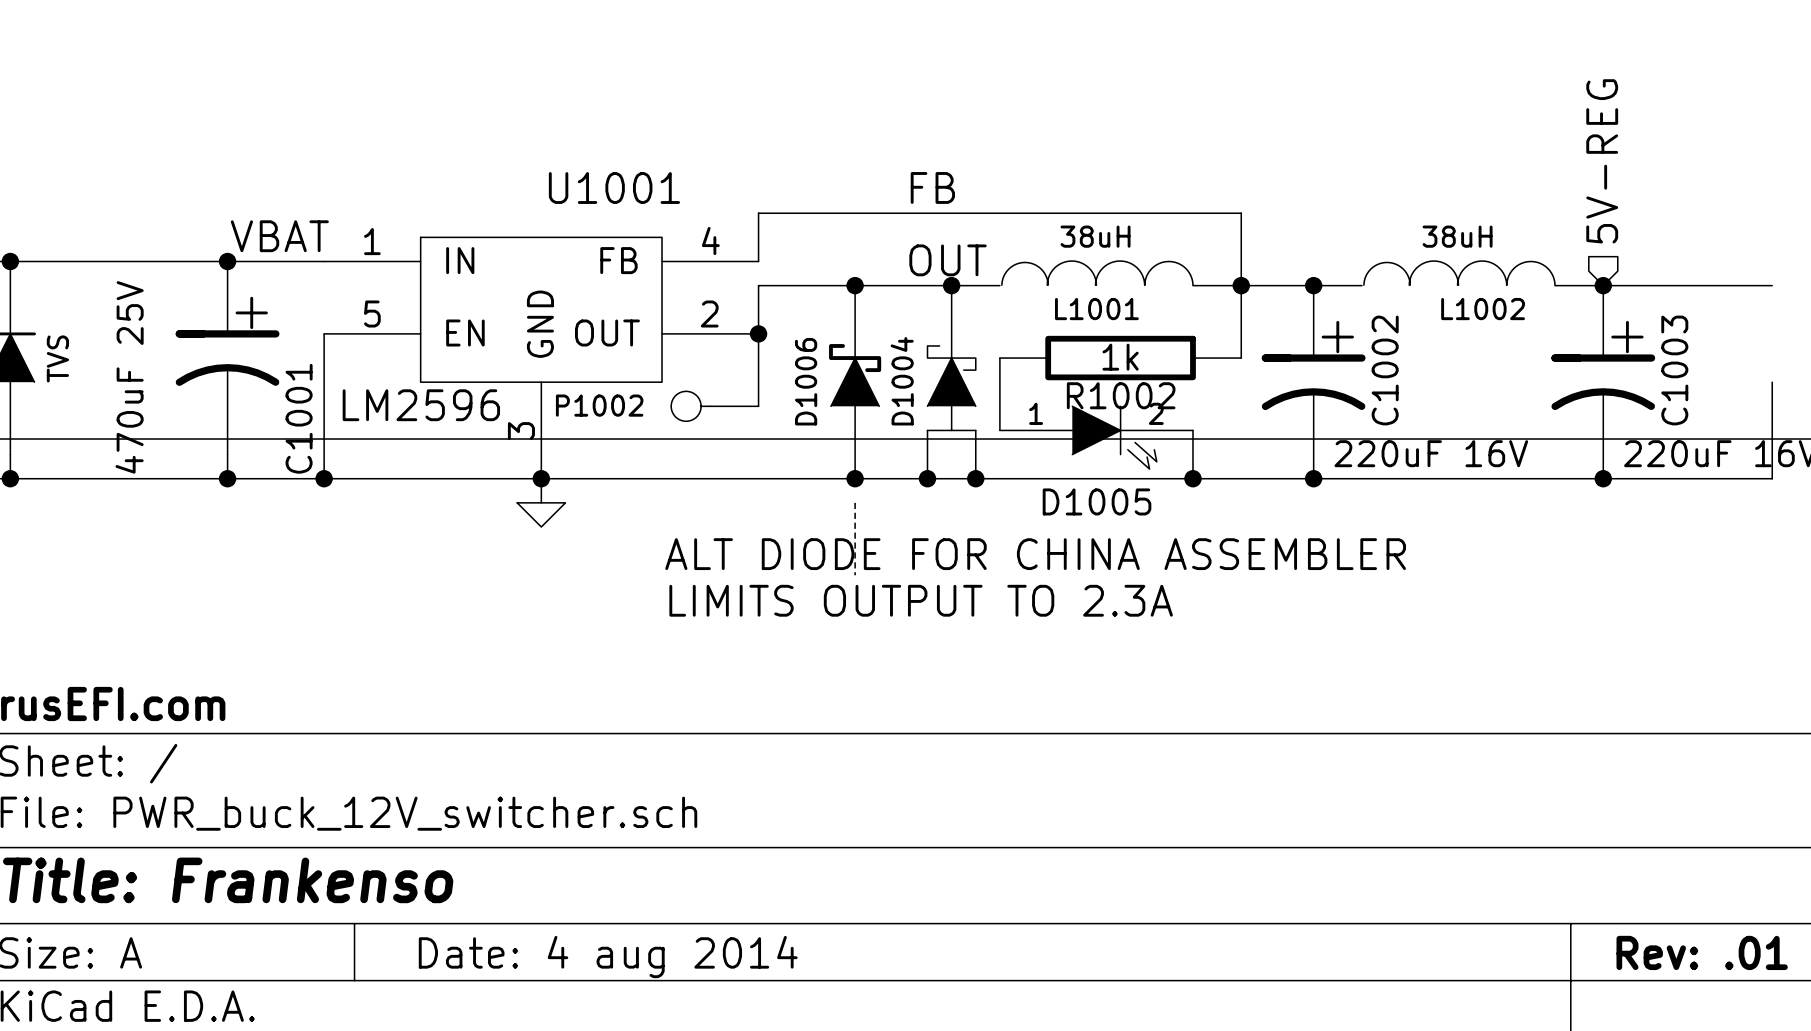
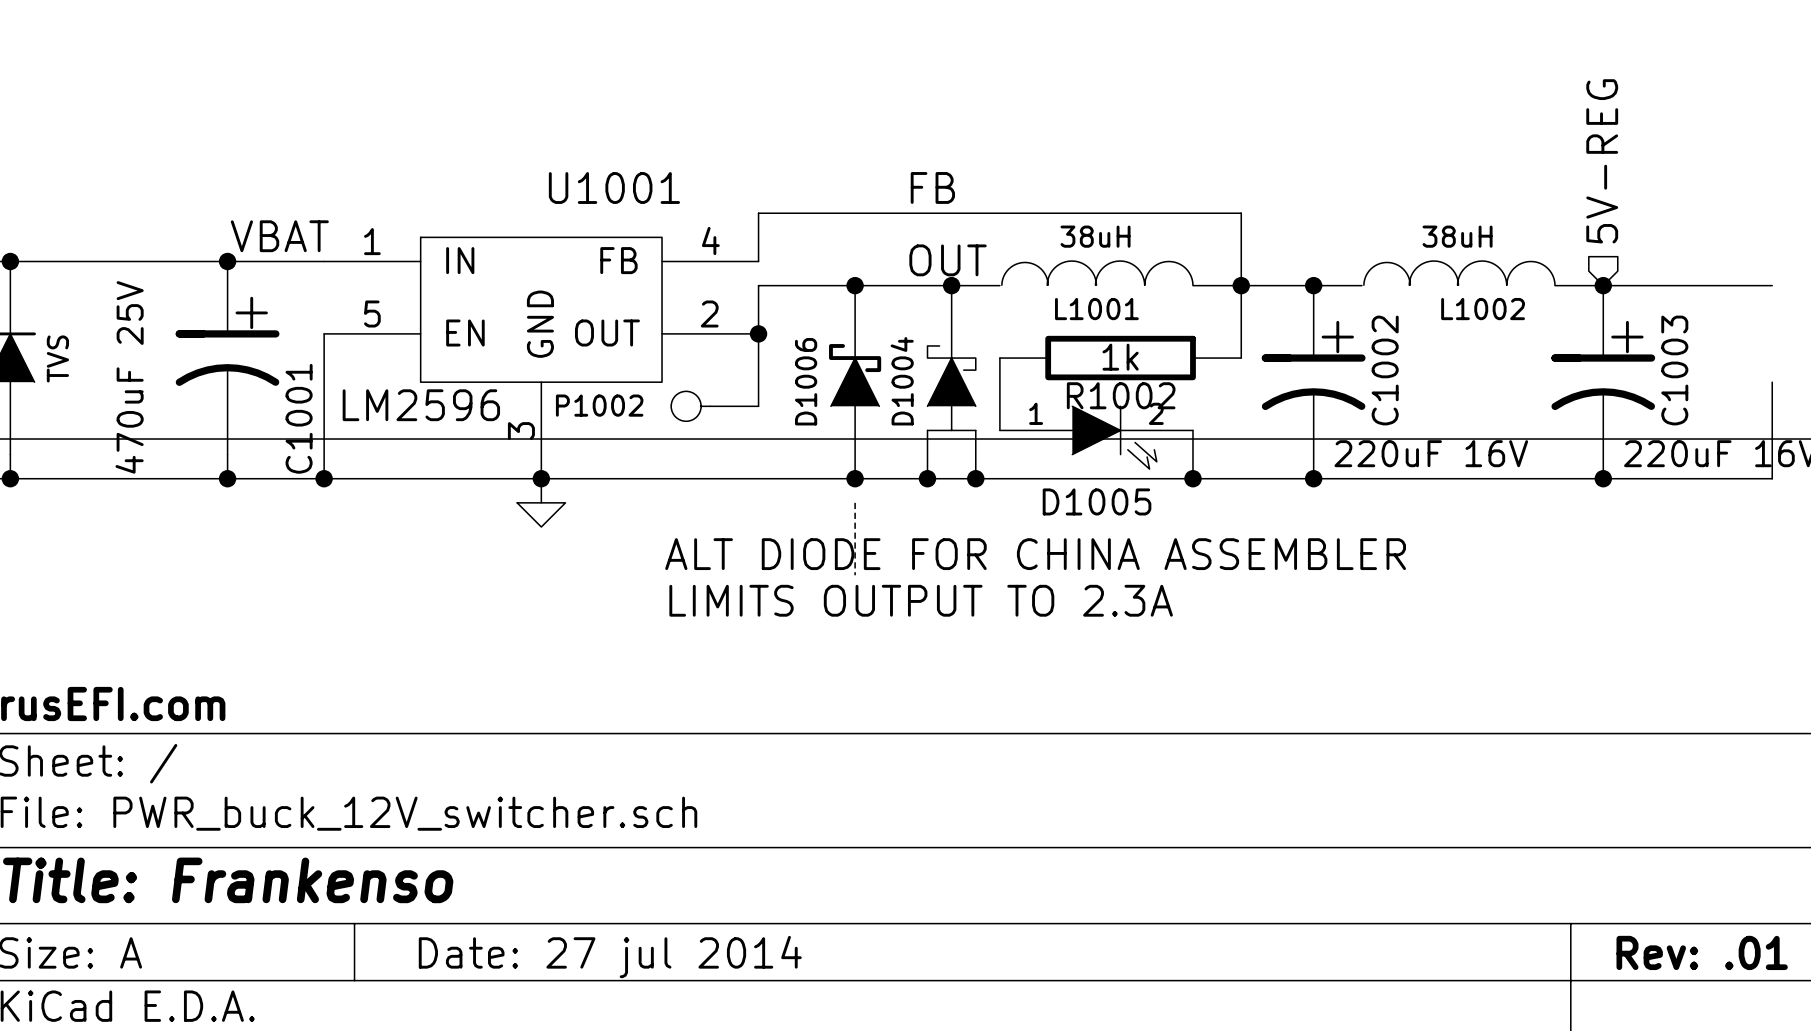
title block: Date: 4 aug 2014 (608, 957) -> Date: 27 jul 2014 (610, 957)

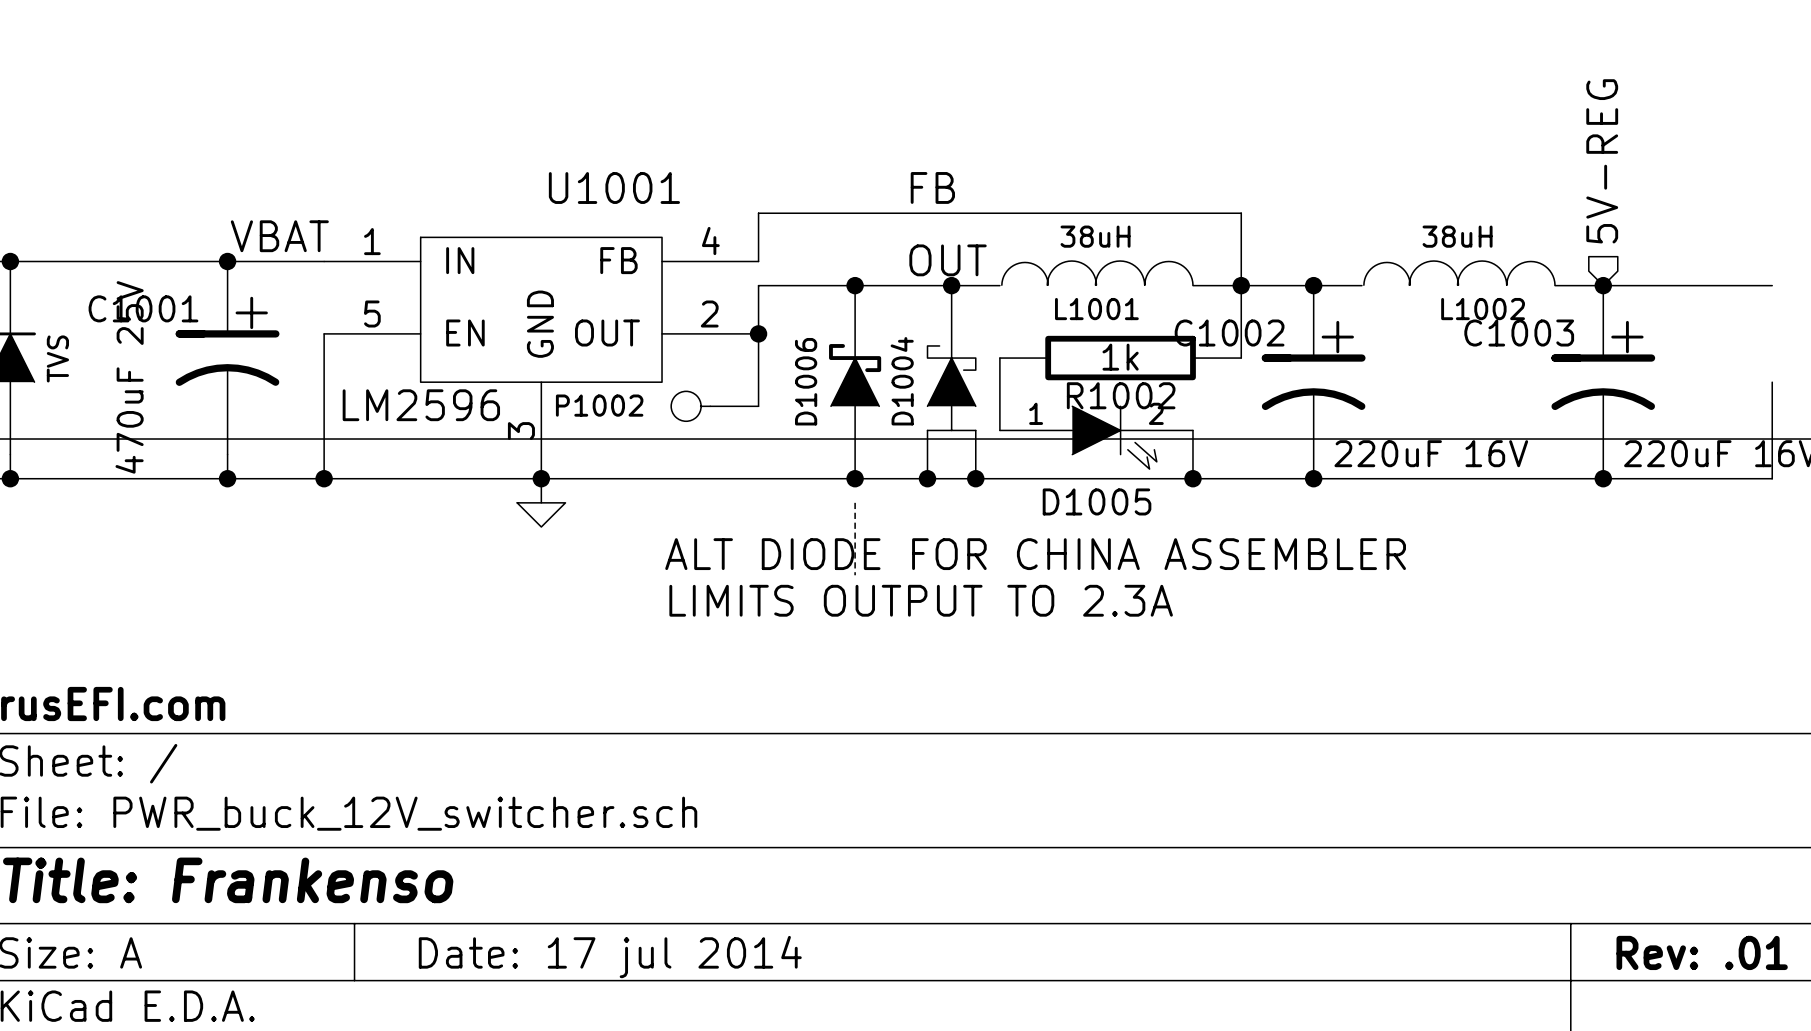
C1002 name rotation: 0° (1385, 370) -> 90° clockwise (1229, 333)
C1002 name position: C1002 (1385, 370) -> C1002 (1229, 333)
C1003 name rotation: 0° (1674, 370) -> 90° clockwise (1519, 333)
C1003 name position: C1003 (1674, 370) -> C1003 (1519, 333)
C1001 name rotation: 0° (299, 418) -> 90° clockwise (143, 308)
C1001 name position: C1001 (299, 418) -> C1001 (143, 308)
title block: Date: 27 jul 2014 (610, 957) -> Date: 17 jul 2014 (610, 957)

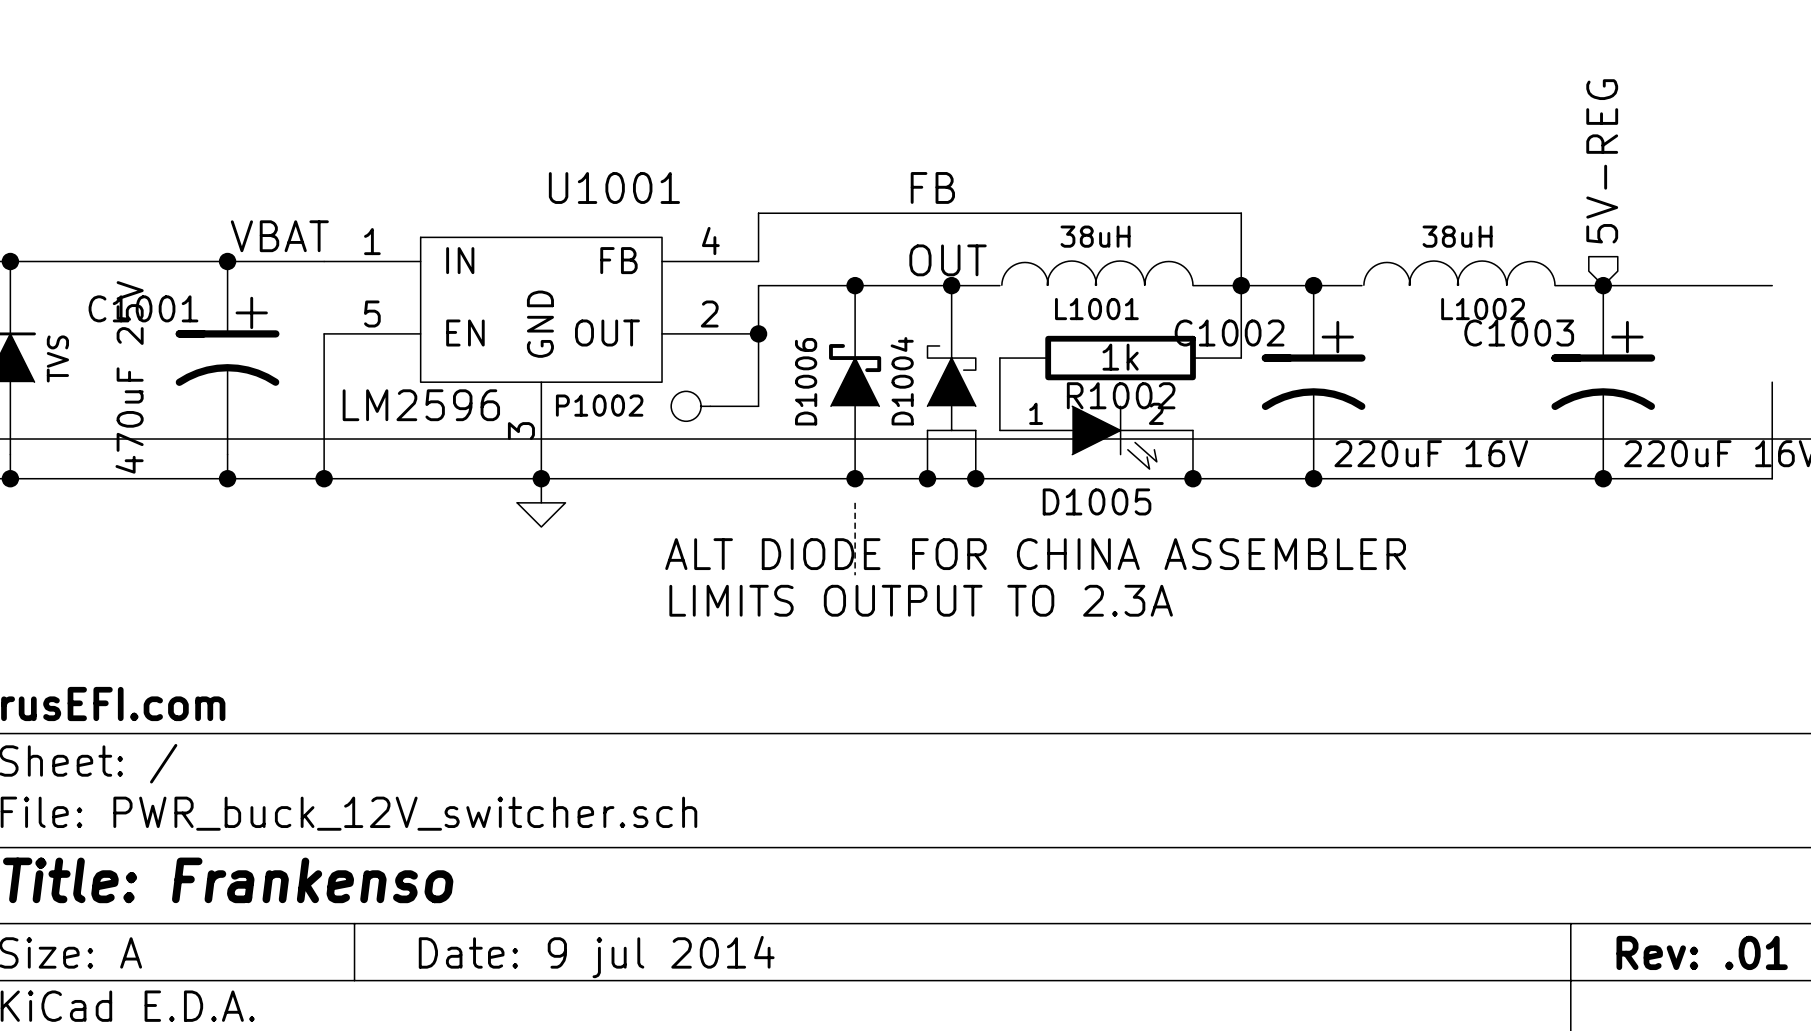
title block: Date: 17 jul 2014 (610, 957) -> Date: 9 jul 2014 (596, 957)

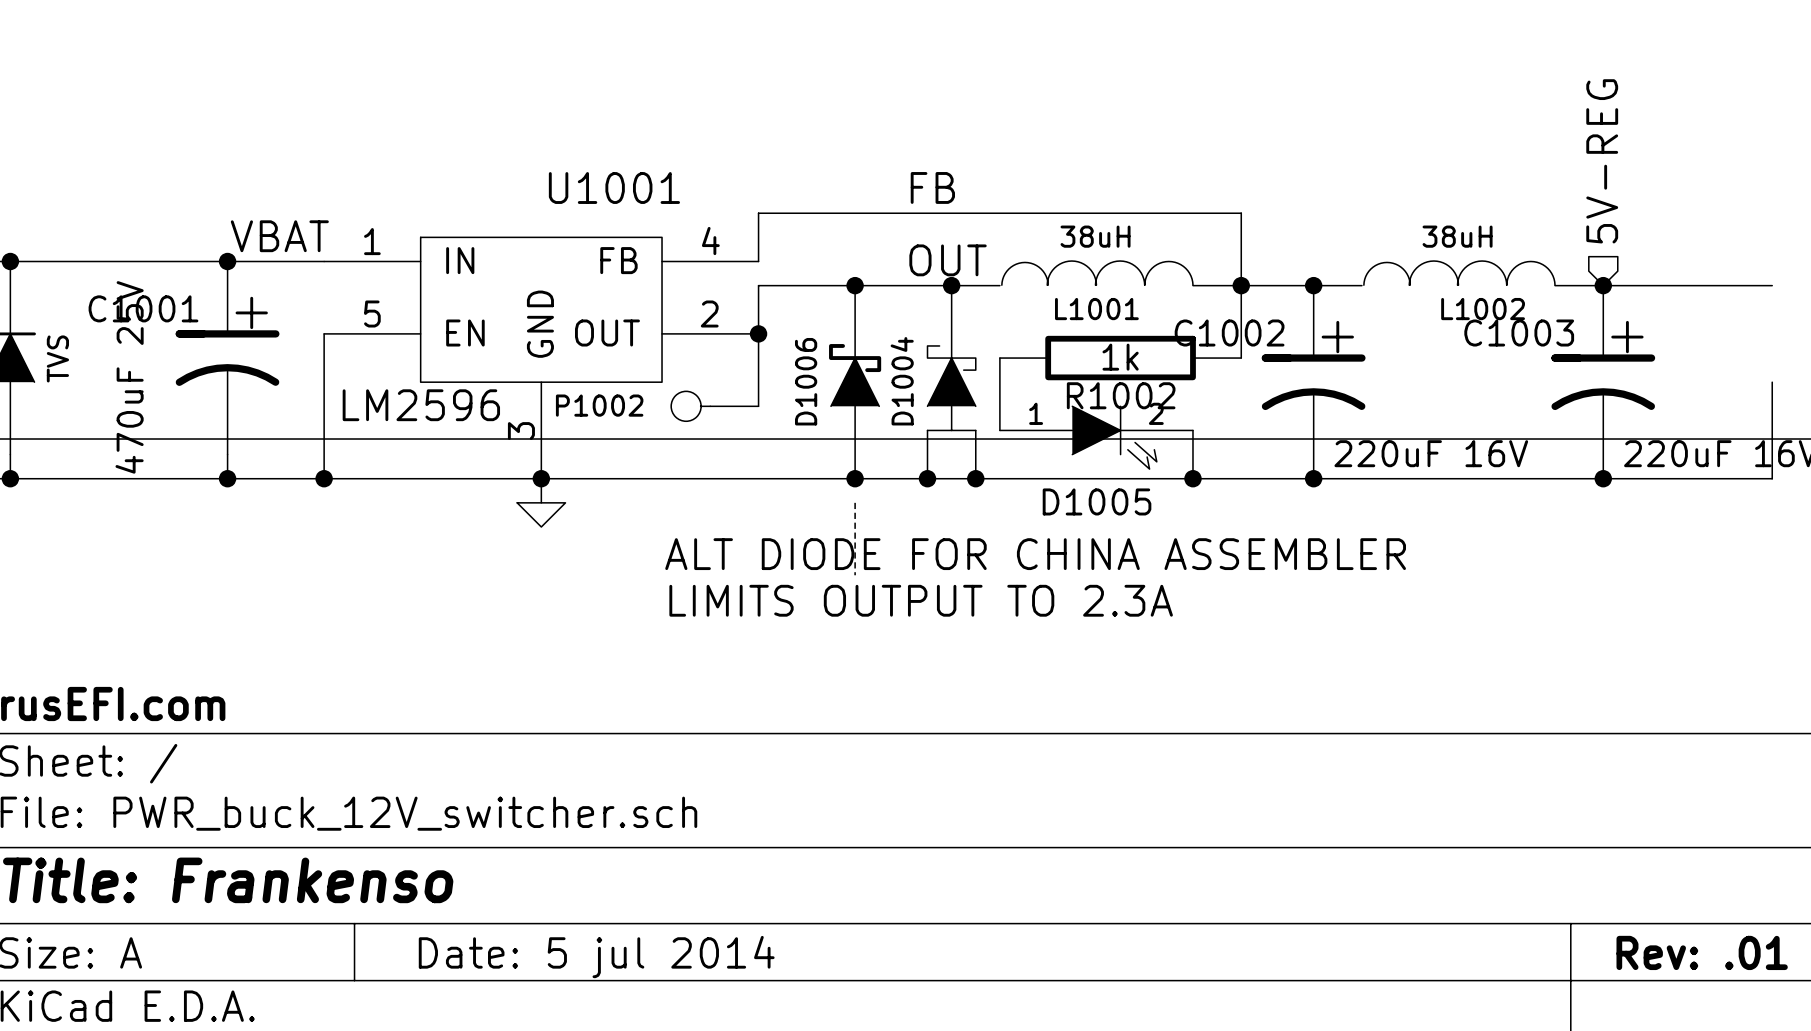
title block: Date: 9 jul 2014 (596, 957) -> Date: 5 jul 2014 (596, 957)

